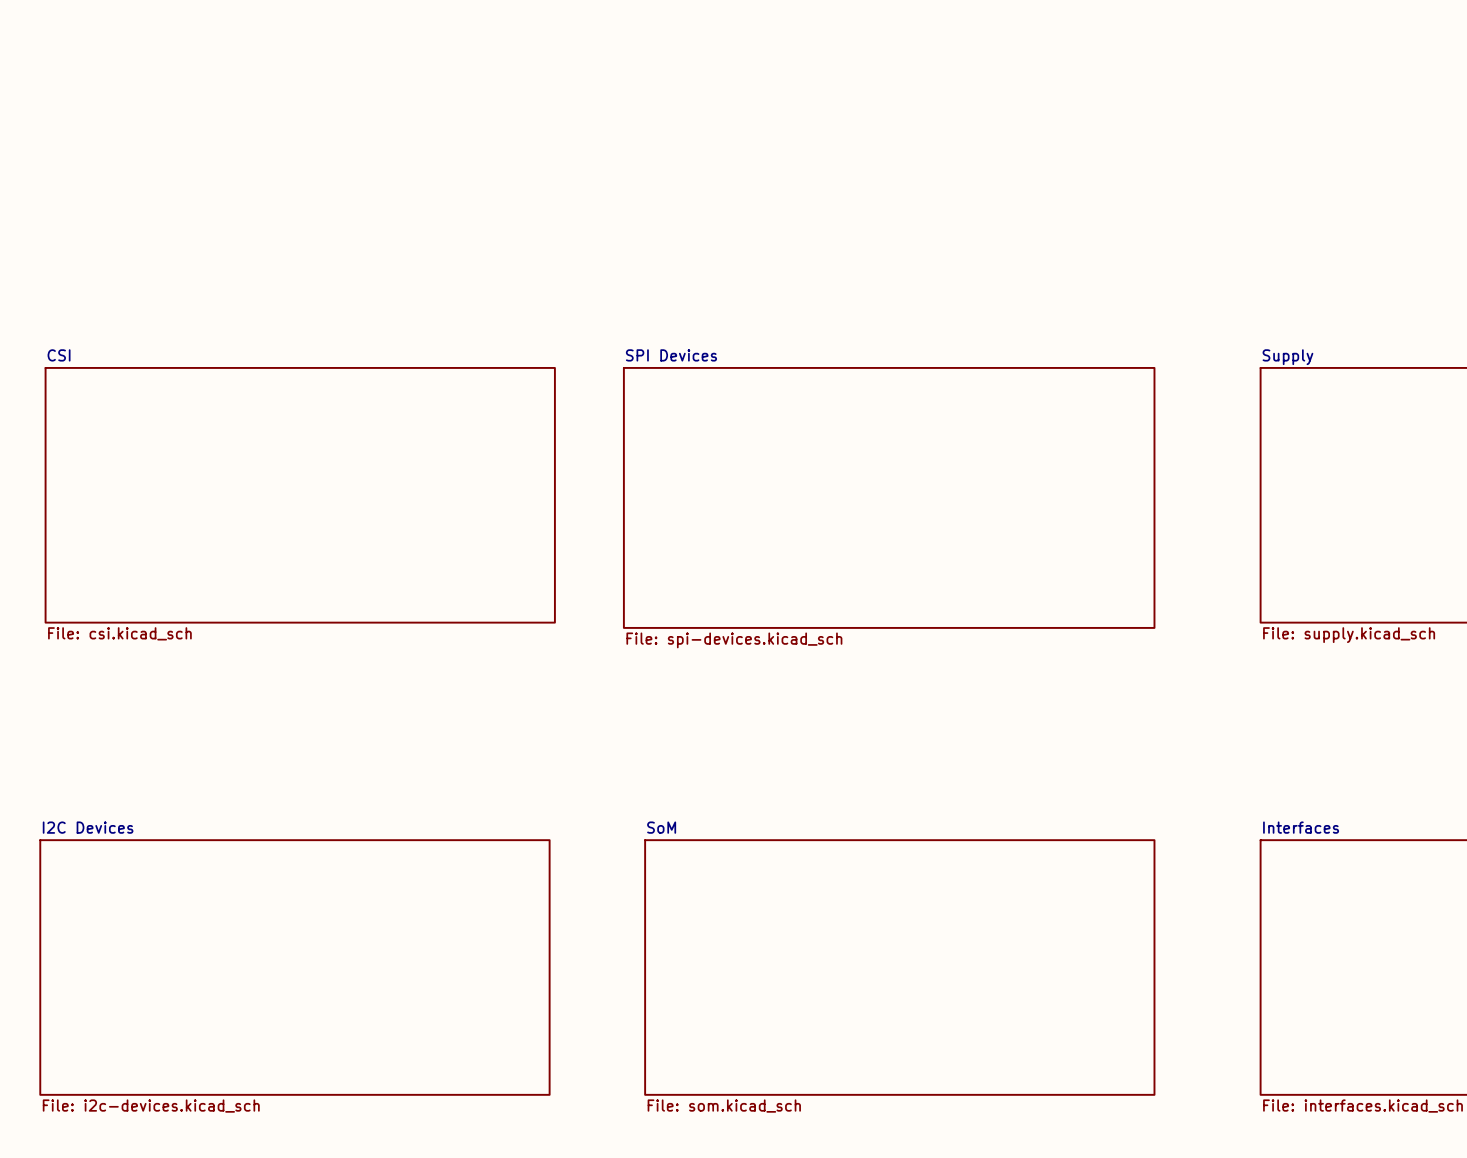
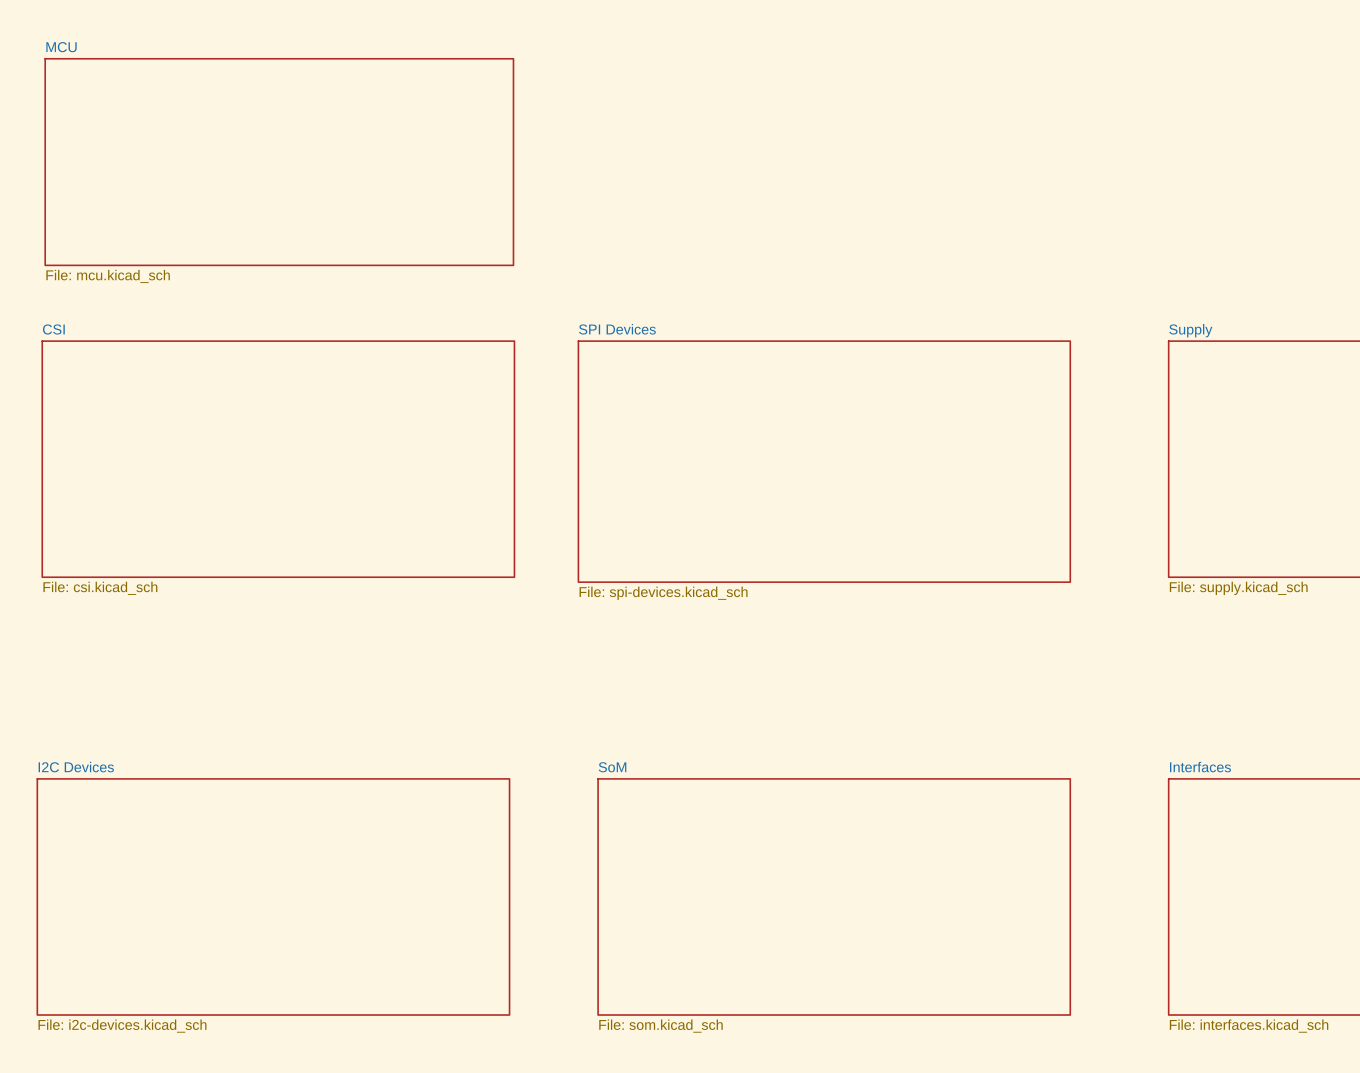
sheet MCU: none -> File: mcu.kicad_sch (279, 162)

